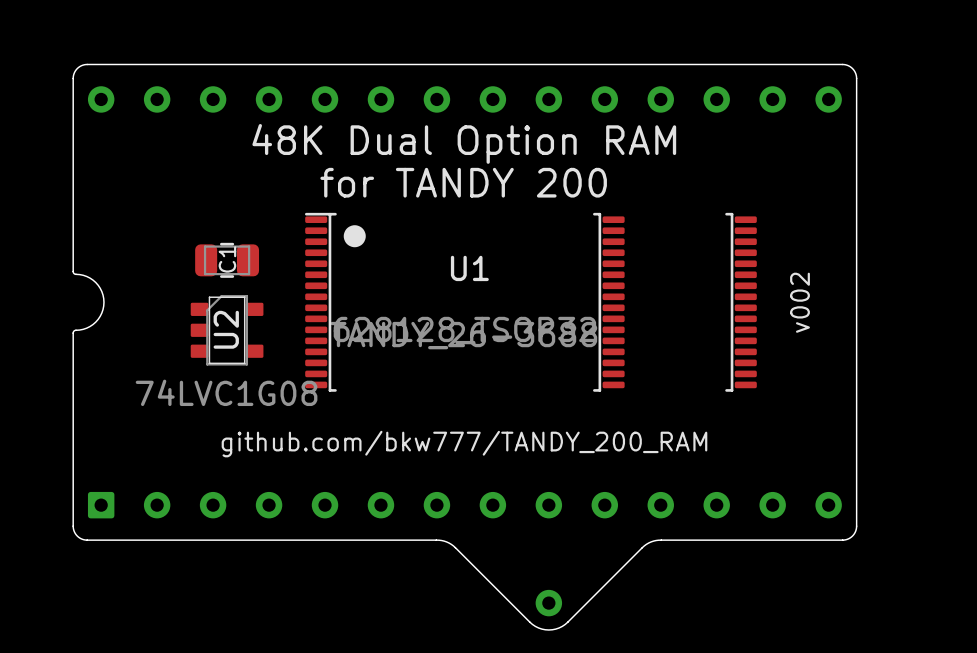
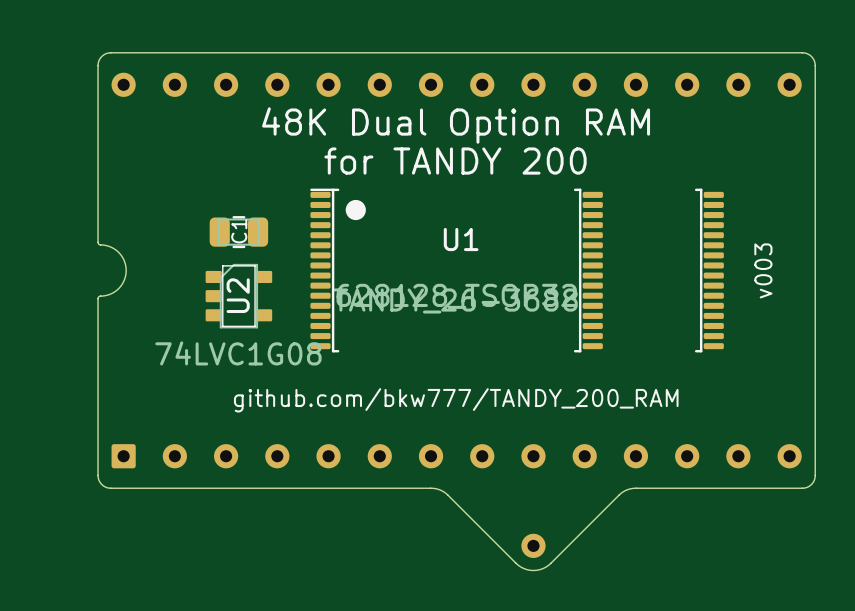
text: v002 (800, 302) -> v003 (763, 270)

